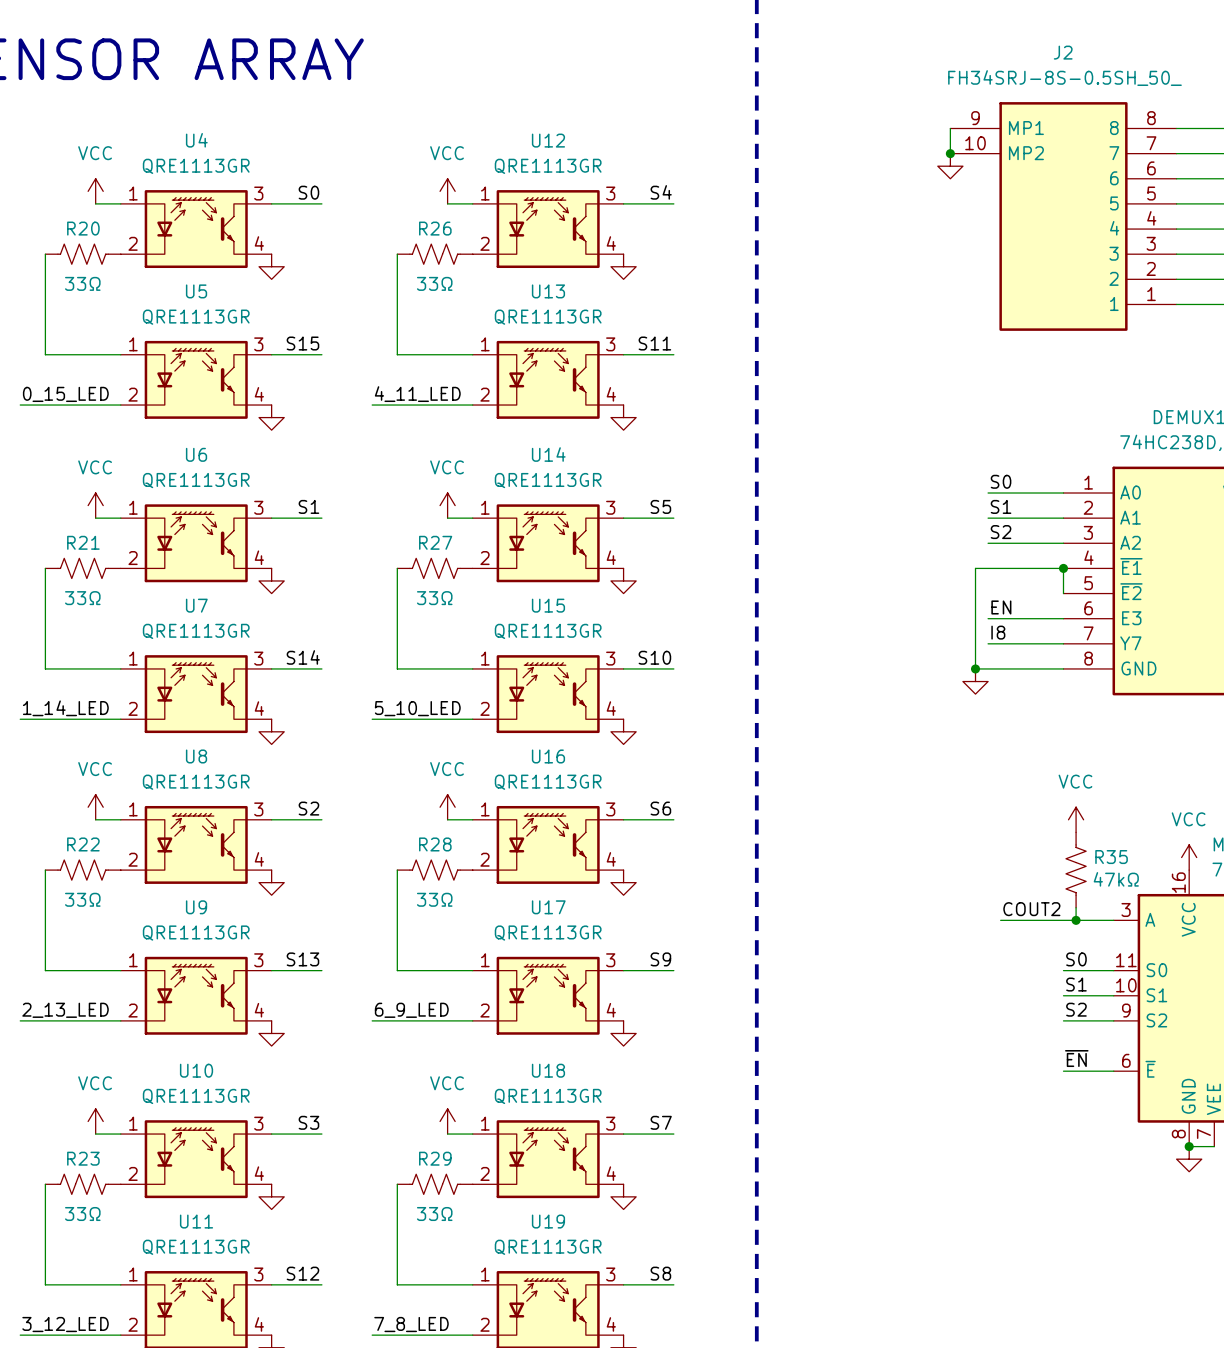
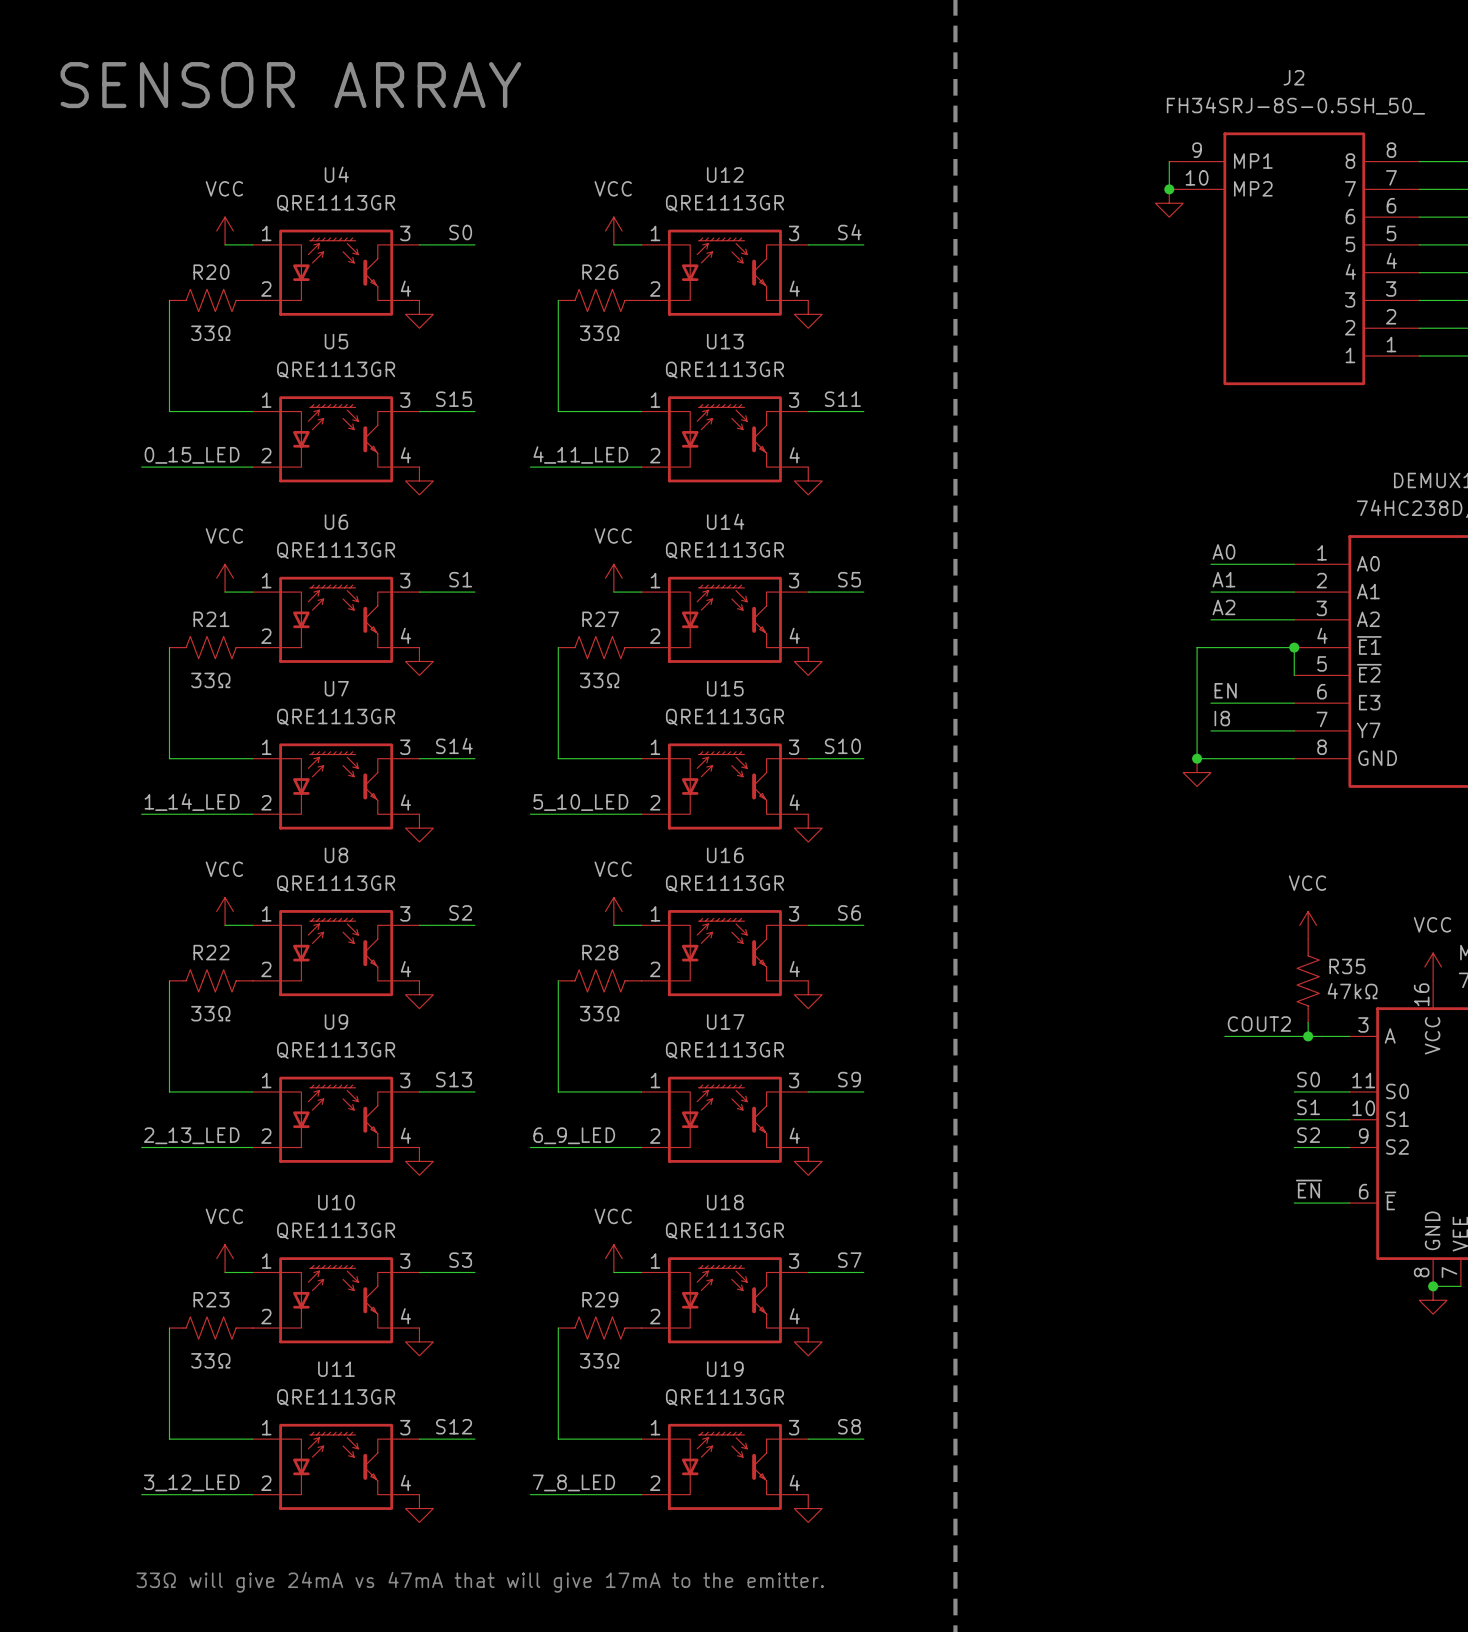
label: S0 (1001, 481) -> A0 (1223, 551)
label: S1 (1001, 506) -> A1 (1223, 579)
label: S2 (1001, 532) -> A2 (1223, 607)

